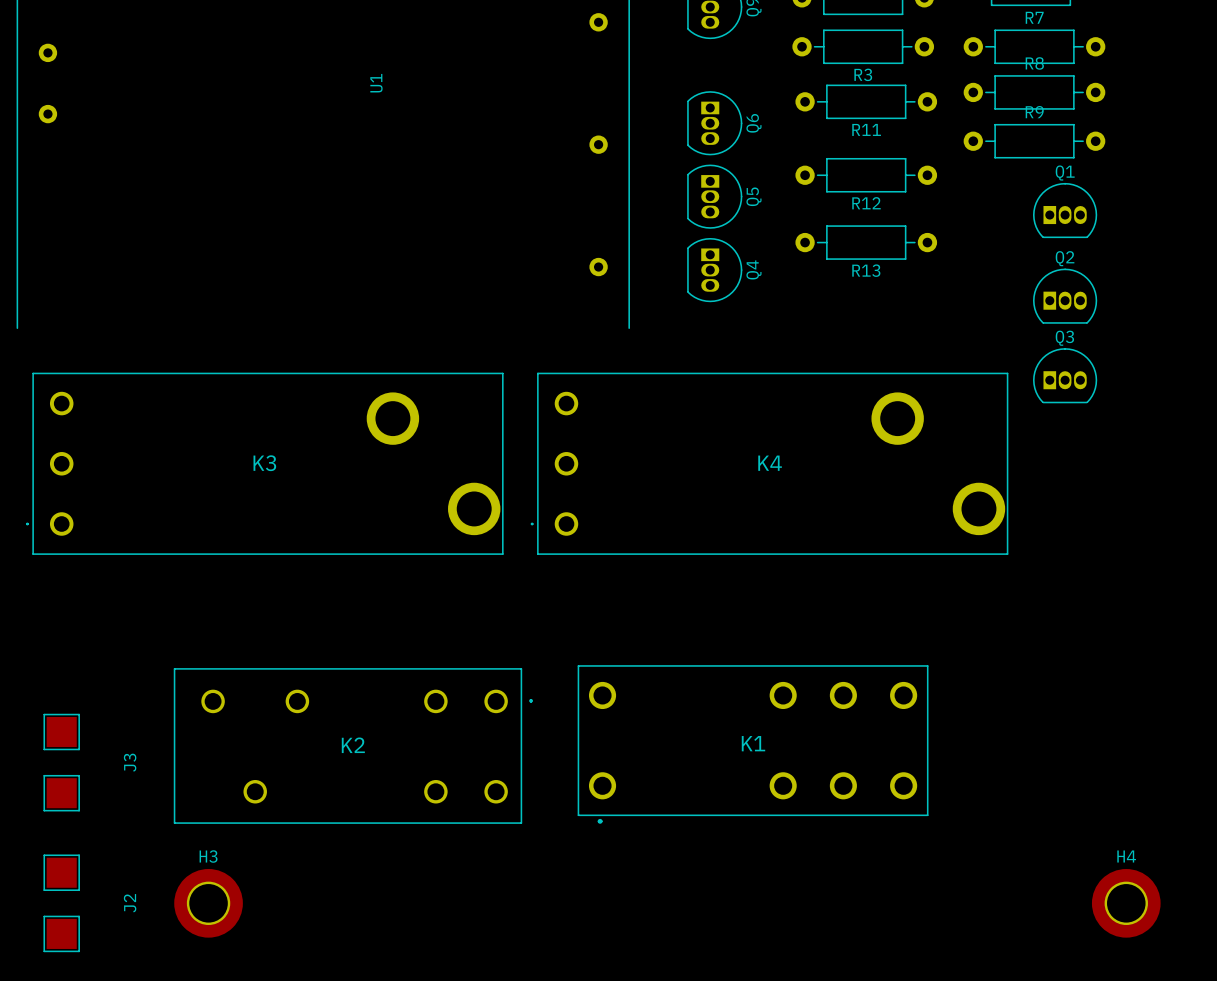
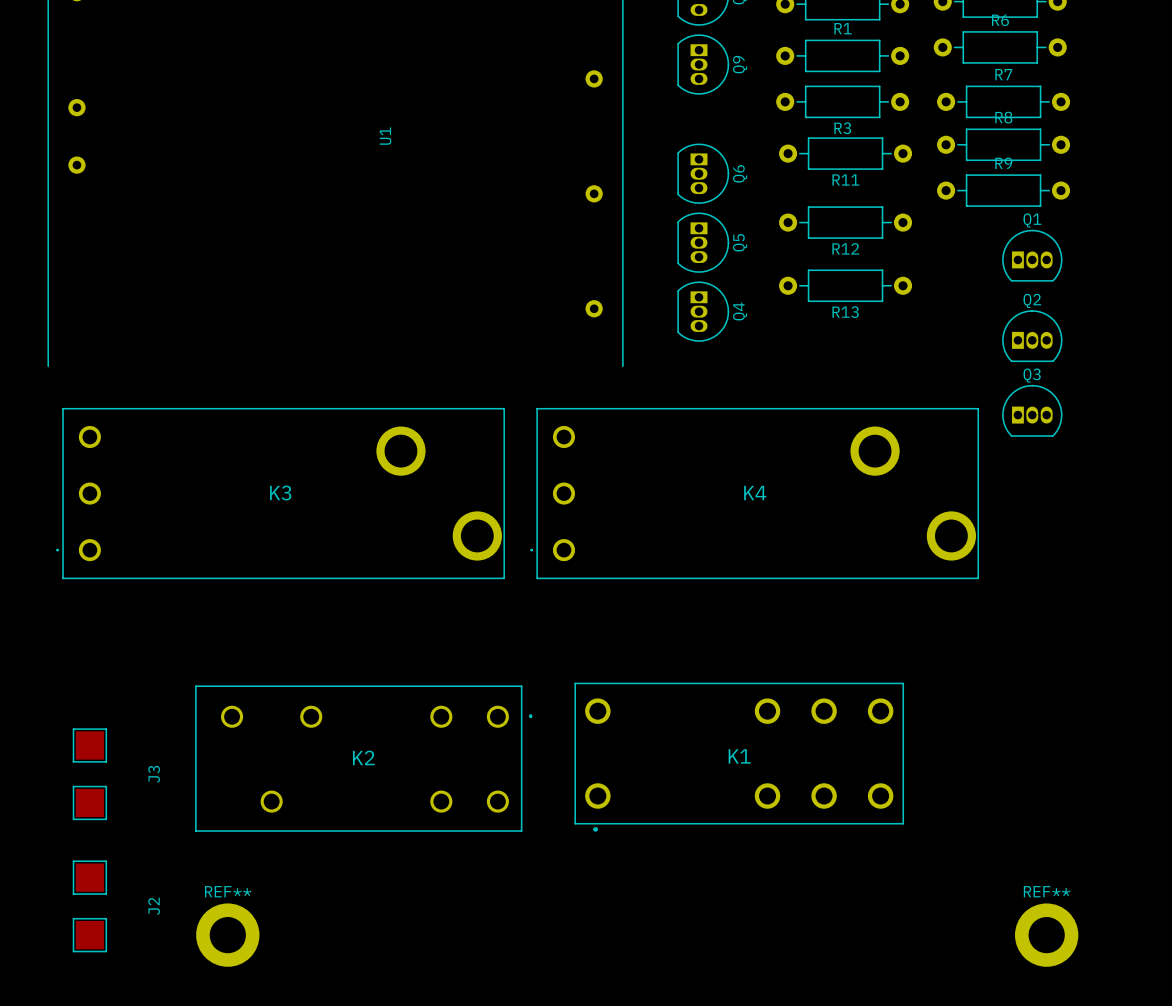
H3: (208, 903) -> none
H4: (1126, 903) -> none
REF**: none -> (227, 935)
REF**: none -> (1046, 935)

